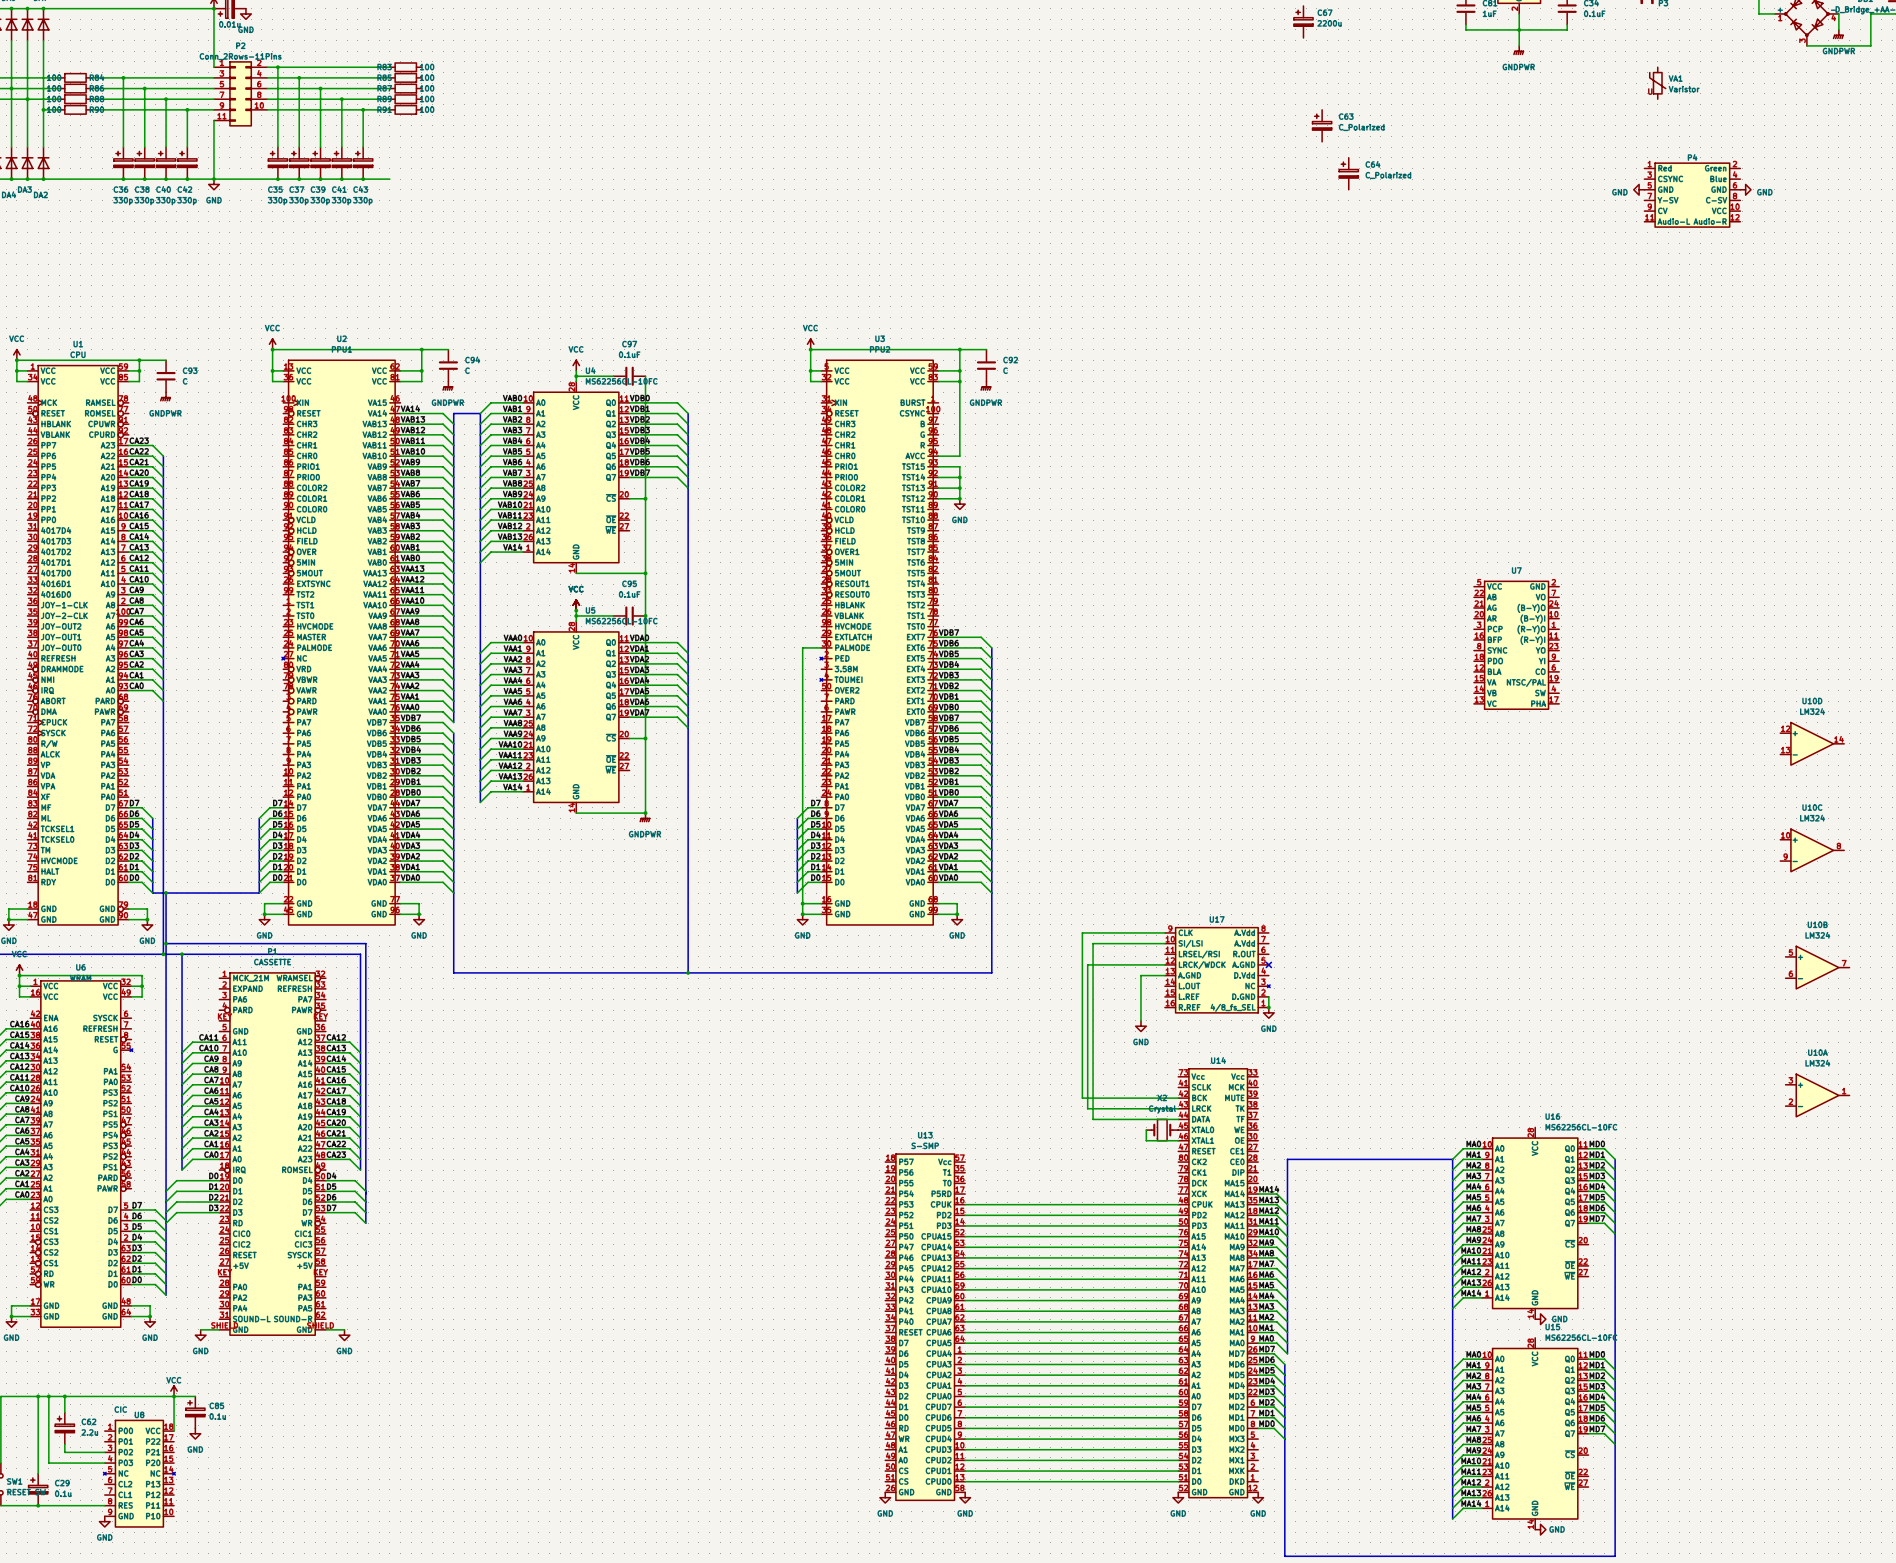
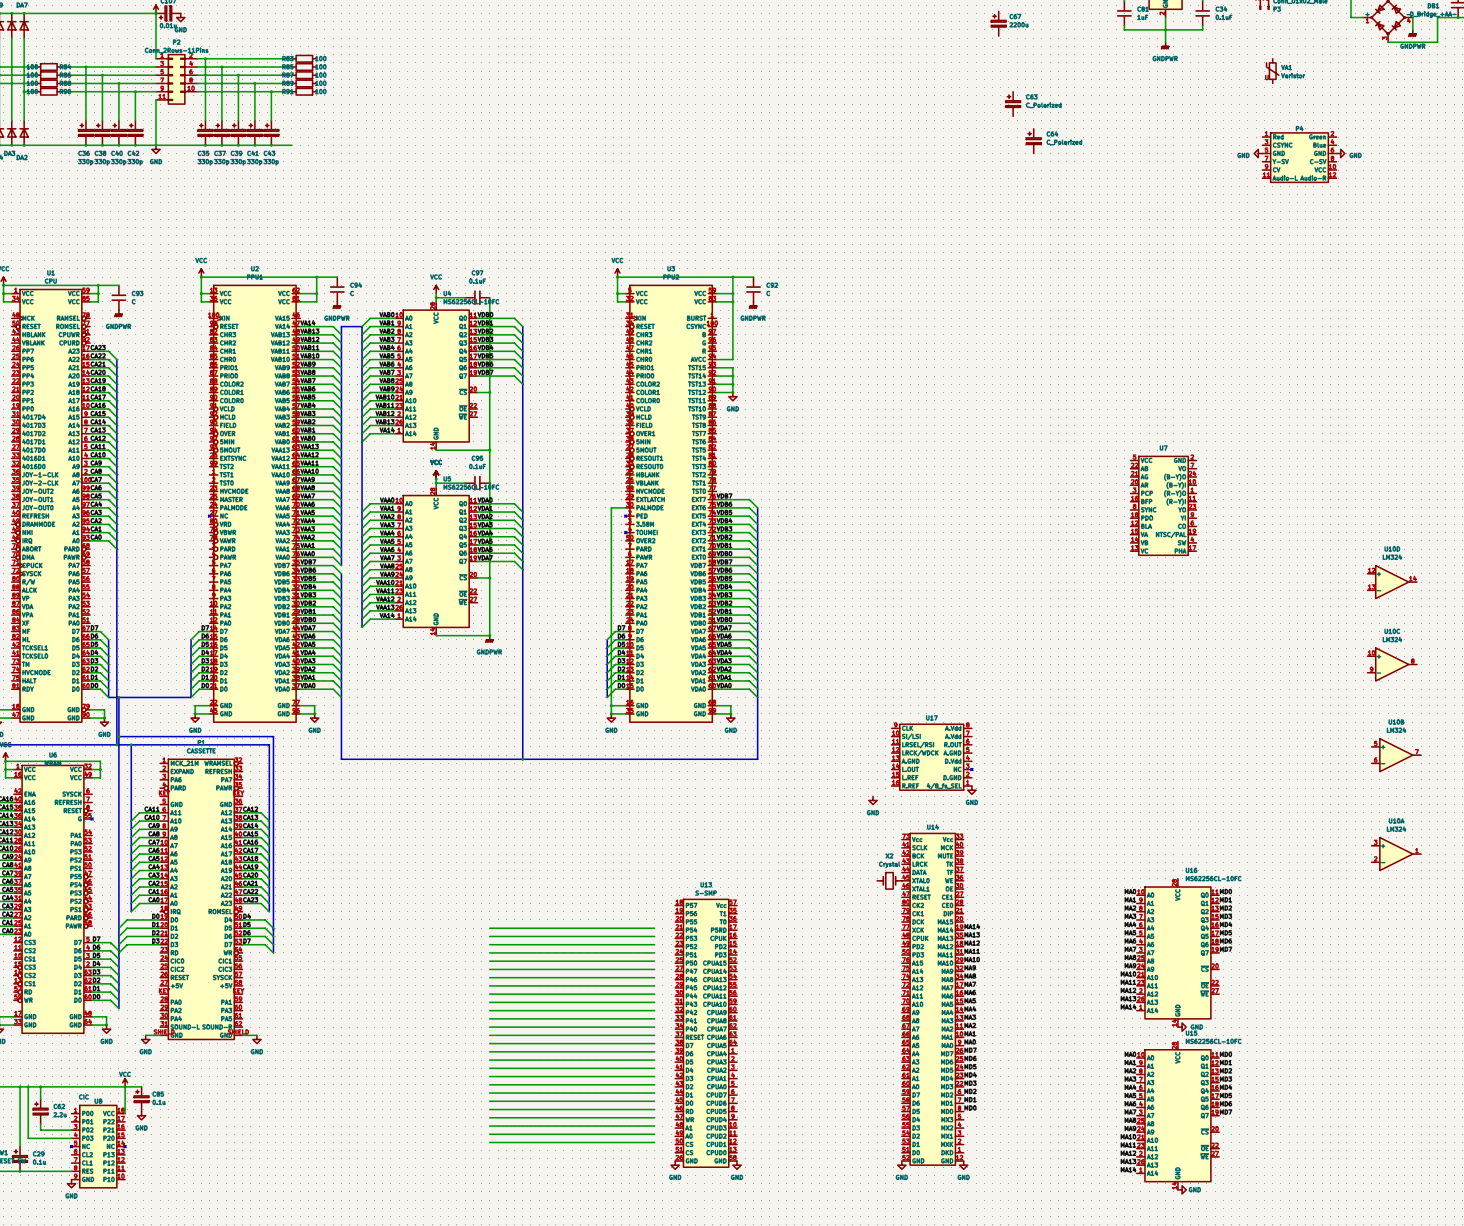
wire: (1164, 932) (1082, 932) (1082, 1098) (1178, 1098) -> none
wire: (1164, 943) (1093, 943) (1093, 1119) (1178, 1119) -> none
wire: (1164, 964) (1087, 964) (1087, 1108) (1178, 1108) -> none
no-connect mark: (1268, 964) -> none
wire: (1164, 975) (1140, 975) (1140, 1020) -> none
wire: (1268, 996) (1268, 1007) -> none
junction: (1268, 1007) -> none
wire: (1146, 1130) (1146, 1140) (1178, 1140) -> none
wire: (1481, 1148) (1463, 1148) (1452, 1159) -> none
wire: (1588, 1148) (1604, 1148) (1615, 1159) -> none
wire: (1481, 1159) (1463, 1159) (1452, 1170) -> none
wire: (1588, 1159) (1604, 1159) (1615, 1170) -> none
bus: (1615, 1159) (1615, 1556) (1284, 1556) (1284, 1364) -> none
wire: (1481, 1170) (1463, 1170) (1452, 1180) -> none
wire: (1588, 1170) (1604, 1170) (1615, 1180) -> none
wire: (1481, 1180) (1463, 1180) (1452, 1191) -> none
wire: (1588, 1180) (1604, 1180) (1615, 1191) -> none
wire: none -> (489, 928) (654, 928)
wire: (1481, 1191) (1463, 1191) (1452, 1202) -> none
wire: (1588, 1191) (1604, 1191) (1615, 1202) -> none
wire: (1258, 1194) (1276, 1194) (1287, 1204) -> none
wire: none -> (489, 936) (654, 936)
wire: (1481, 1202) (1463, 1202) (1452, 1212) -> none
wire: (1588, 1202) (1604, 1202) (1615, 1212) -> none
wire: (965, 1204) (1178, 1204) -> none
wire: (1258, 1204) (1276, 1204) (1287, 1215) -> none
wire: none -> (489, 944) (654, 944)
wire: (1481, 1212) (1463, 1212) (1452, 1223) -> none
wire: (1588, 1212) (1604, 1212) (1615, 1223) -> none
wire: (965, 1215) (1178, 1215) -> none
wire: (1258, 1215) (1276, 1215) (1287, 1225) -> none
wire: none -> (489, 952) (654, 952)
wire: (1481, 1223) (1463, 1223) (1452, 1233) -> none
wire: (1588, 1223) (1604, 1223) (1615, 1233) -> none
wire: (965, 1225) (1178, 1225) -> none
wire: (1258, 1225) (1276, 1225) (1287, 1236) -> none
wire: none -> (489, 961) (654, 961)
wire: (1481, 1233) (1463, 1233) (1452, 1244) -> none
wire: (965, 1236) (1178, 1236) -> none
wire: (1258, 1236) (1276, 1236) (1287, 1247) -> none
wire: none -> (489, 969) (654, 969)
wire: (1481, 1244) (1463, 1244) (1452, 1255) -> none
wire: (965, 1247) (1178, 1247) -> none
wire: (1258, 1247) (1276, 1247) (1287, 1257) -> none
wire: none -> (489, 977) (654, 977)
wire: (1481, 1255) (1463, 1255) (1452, 1265) -> none
wire: (965, 1257) (1178, 1257) -> none
wire: (1258, 1257) (1276, 1257) (1287, 1268) -> none
wire: none -> (489, 985) (654, 985)
wire: (1481, 1265) (1463, 1265) (1452, 1276) -> none
wire: (965, 1268) (1178, 1268) -> none
wire: (1258, 1268) (1276, 1268) (1287, 1279) -> none
wire: none -> (489, 994) (654, 994)
wire: (1481, 1276) (1463, 1276) (1452, 1287) -> none
wire: (965, 1279) (1178, 1279) -> none
wire: (1258, 1279) (1276, 1279) (1287, 1289) -> none
wire: none -> (489, 1002) (654, 1002)
wire: (1481, 1287) (1463, 1287) (1452, 1297) -> none
wire: (965, 1289) (1178, 1289) -> none
wire: (1258, 1289) (1276, 1289) (1287, 1300) -> none
wire: none -> (489, 1010) (654, 1010)
wire: (1481, 1297) (1463, 1297) (1452, 1308) -> none
wire: (965, 1300) (1178, 1300) -> none
wire: (1258, 1300) (1276, 1300) (1287, 1311) -> none
wire: none -> (489, 1018) (654, 1018)
wire: (965, 1311) (1178, 1311) -> none
wire: (1258, 1311) (1276, 1311) (1287, 1321) -> none
wire: none -> (489, 1027) (654, 1027)
wire: (965, 1321) (1178, 1321) -> none
wire: (1258, 1321) (1276, 1321) (1287, 1332) -> none
wire: none -> (489, 1035) (654, 1035)
wire: (965, 1332) (1178, 1332) -> none
wire: (1258, 1332) (1276, 1332) (1287, 1343) -> none
wire: none -> (489, 1043) (654, 1043)
wire: (965, 1343) (1178, 1343) -> none
wire: (1258, 1343) (1276, 1343) (1287, 1353) -> none
wire: none -> (489, 1051) (654, 1051)
wire: (965, 1353) (1178, 1353) -> none
wire: (1258, 1353) (1274, 1353) (1284, 1364) -> none
bus: (1287, 1353) (1287, 1159) (1452, 1159) (1452, 1518) -> none
wire: (1481, 1359) (1463, 1359) (1452, 1369) -> none
wire: (1588, 1359) (1604, 1359) (1615, 1369) -> none
wire: none -> (489, 1060) (654, 1060)
wire: (965, 1364) (1178, 1364) -> none
wire: (1258, 1364) (1274, 1364) (1284, 1375) -> none
wire: (1481, 1369) (1463, 1369) (1452, 1380) -> none
wire: (1588, 1369) (1604, 1369) (1615, 1380) -> none
wire: none -> (489, 1068) (654, 1068)
wire: (965, 1375) (1178, 1375) -> none
wire: (1258, 1375) (1274, 1375) (1284, 1385) -> none
wire: (1481, 1380) (1463, 1380) (1452, 1391) -> none
wire: (1588, 1380) (1604, 1380) (1615, 1391) -> none
wire: none -> (489, 1076) (654, 1076)
wire: (965, 1385) (1178, 1385) -> none
wire: (1258, 1385) (1274, 1385) (1284, 1396) -> none
wire: (1481, 1391) (1463, 1391) (1452, 1401) -> none
wire: (1588, 1391) (1604, 1391) (1615, 1401) -> none
wire: none -> (489, 1084) (654, 1084)
wire: (965, 1396) (1178, 1396) -> none
wire: (1258, 1396) (1274, 1396) (1284, 1407) -> none
wire: (1481, 1401) (1463, 1401) (1452, 1412) -> none
wire: (1588, 1401) (1604, 1401) (1615, 1412) -> none
wire: none -> (489, 1093) (654, 1093)
wire: (965, 1407) (1178, 1407) -> none
wire: (1258, 1407) (1274, 1407) (1284, 1417) -> none
wire: (1481, 1412) (1463, 1412) (1452, 1423) -> none
wire: (1588, 1412) (1604, 1412) (1615, 1423) -> none
wire: none -> (489, 1101) (654, 1101)
wire: (965, 1417) (1178, 1417) -> none
wire: (1258, 1417) (1274, 1417) (1284, 1428) -> none
wire: (1481, 1423) (1463, 1423) (1452, 1433) -> none
wire: (1588, 1423) (1604, 1423) (1615, 1433) -> none
wire: none -> (489, 1109) (654, 1109)
wire: (965, 1428) (1178, 1428) -> none
wire: (1258, 1428) (1274, 1428) (1284, 1439) -> none
wire: (1481, 1433) (1463, 1433) (1452, 1444) -> none
wire: (1588, 1433) (1604, 1433) (1615, 1444) -> none
wire: none -> (489, 1117) (654, 1117)
wire: (965, 1439) (1178, 1439) -> none
wire: (1481, 1444) (1463, 1444) (1452, 1455) -> none
wire: none -> (489, 1126) (654, 1126)
wire: (965, 1449) (1178, 1449) -> none
wire: (1481, 1455) (1463, 1455) (1452, 1465) -> none
wire: none -> (489, 1134) (654, 1134)
wire: (965, 1460) (1178, 1460) -> none
wire: (1481, 1465) (1463, 1465) (1452, 1476) -> none
wire: none -> (489, 1142) (654, 1142)
wire: (965, 1471) (1178, 1471) -> none
wire: (1481, 1476) (1463, 1476) (1452, 1487) -> none
wire: (965, 1481) (1178, 1481) -> none
wire: (1481, 1487) (1463, 1487) (1452, 1497) -> none
wire: (1481, 1497) (1463, 1497) (1452, 1508) -> none
wire: (1481, 1508) (1463, 1508) (1452, 1518) -> none

